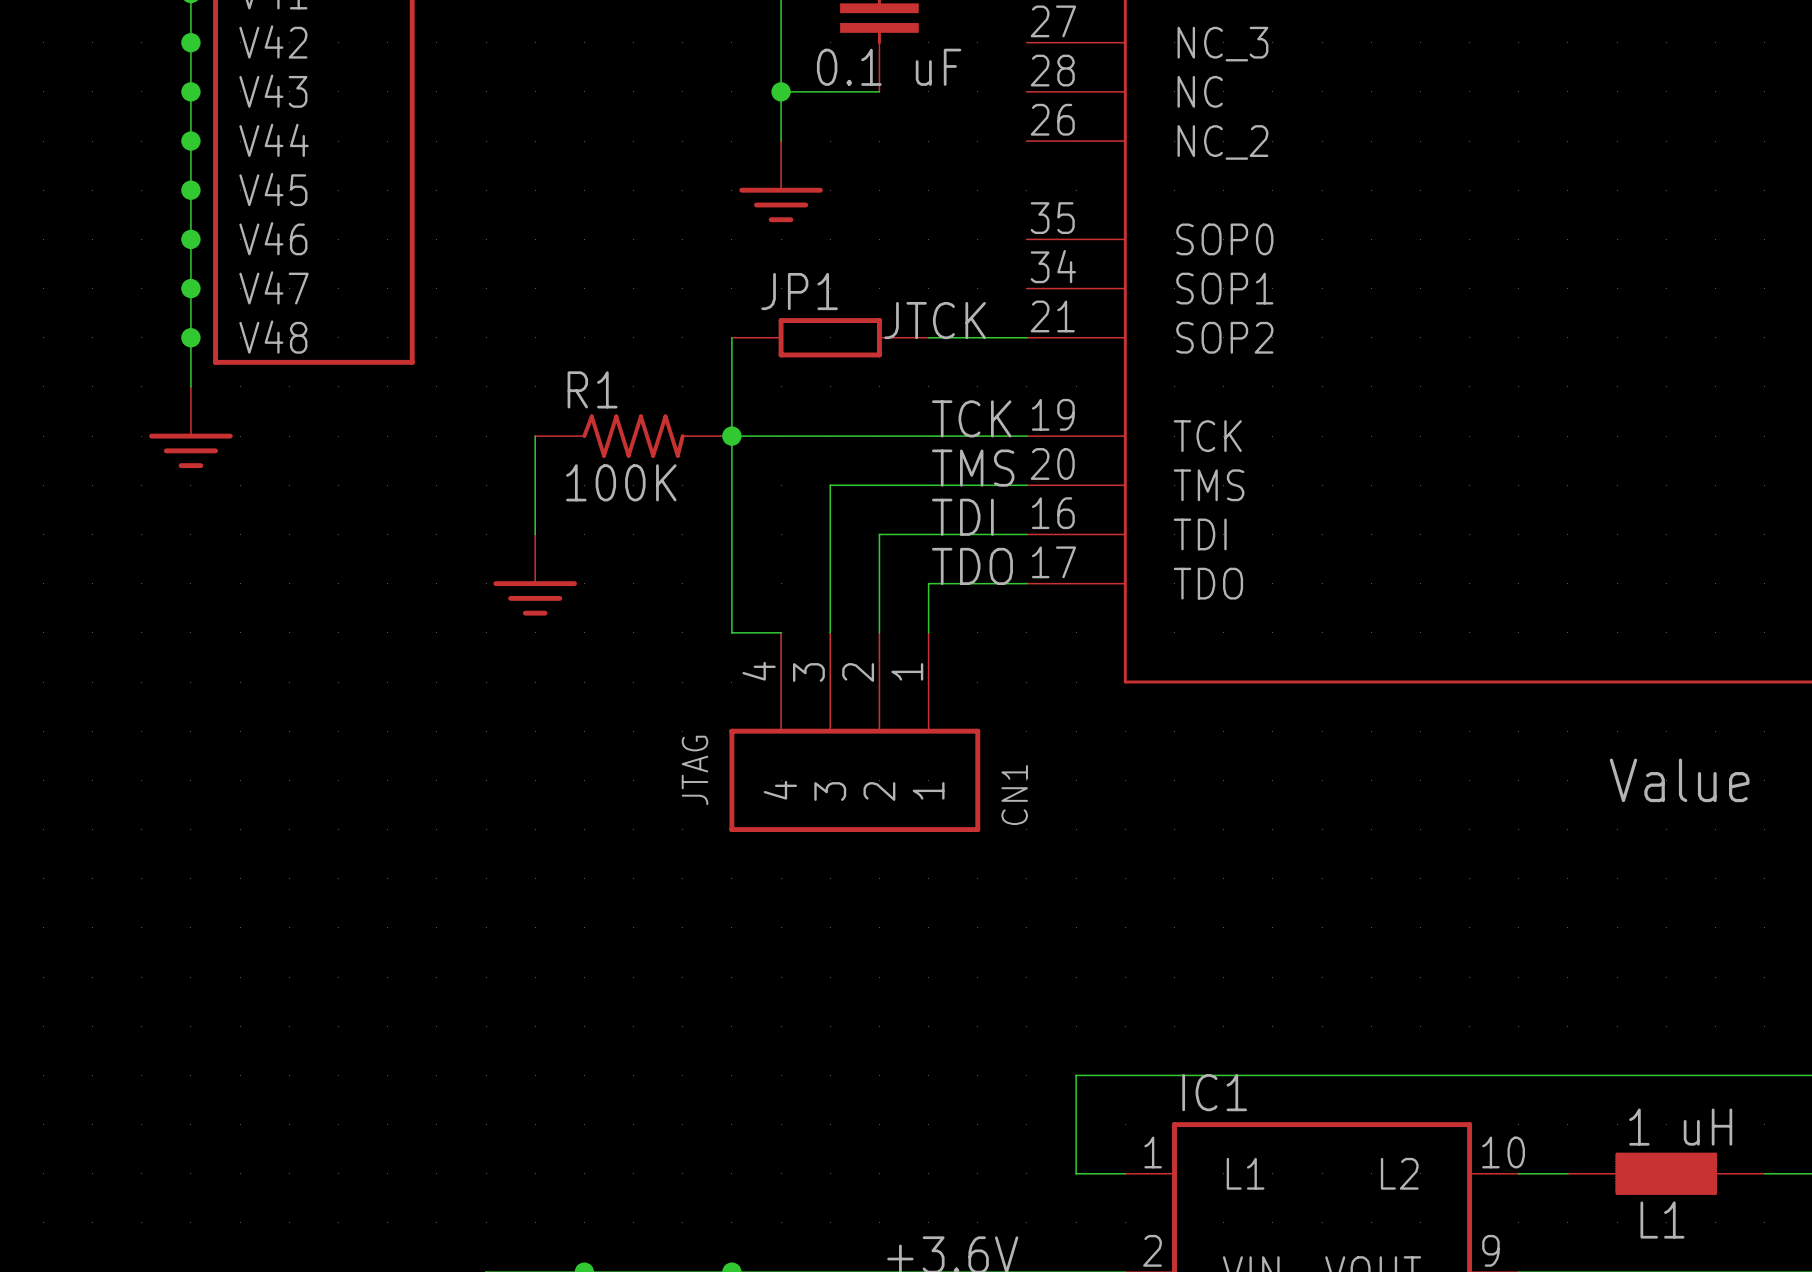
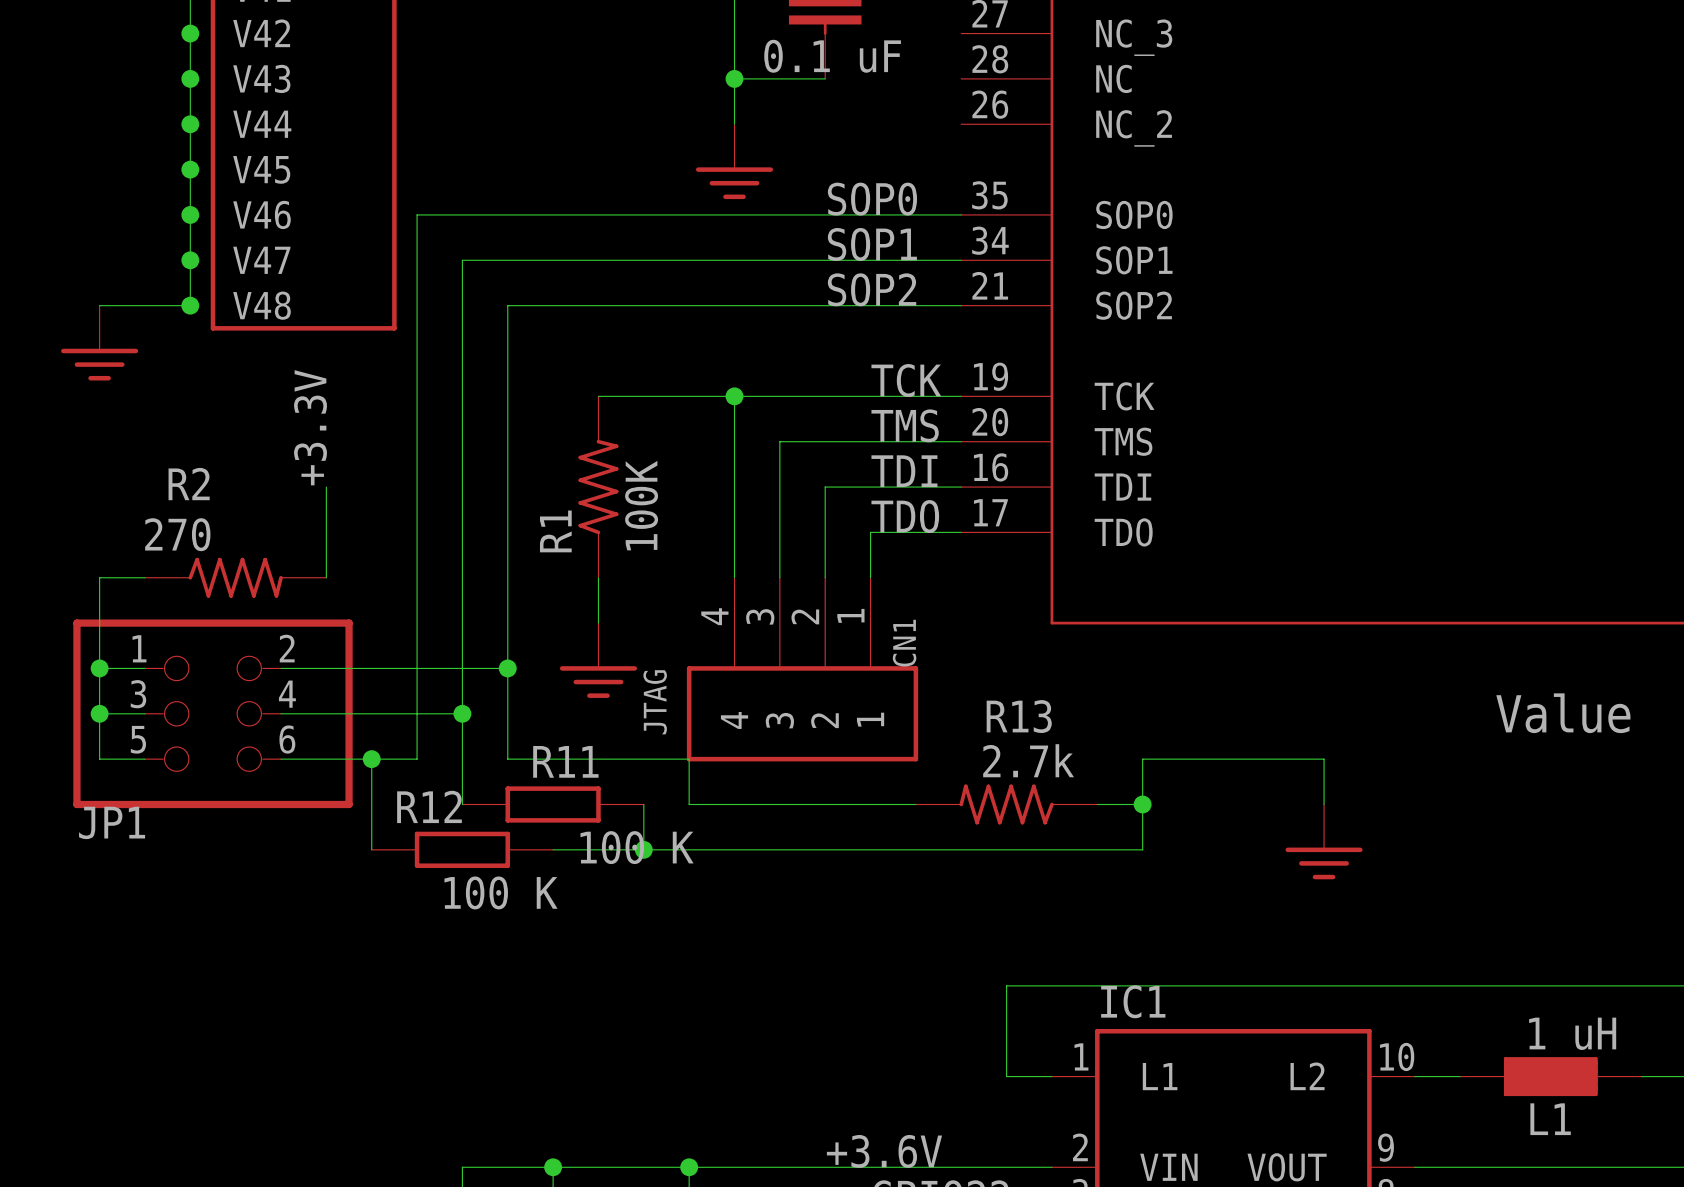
label: none -> SOP0 (872, 199)
wire: none -> (961, 214) (417, 214) (417, 759) (281, 759)
label: none -> SOP1 (872, 244)
wire: none -> (961, 260) (462, 260) (462, 804)
JP1 name position: JP1 (799, 291) -> JP1 (112, 822)
JP1 symbol: [731, 318, 929, 358] -> [73, 619, 353, 809]
label: JTCK (935, 320) -> SOP2 (872, 289)
wire: (190, 337) (190, 386) -> (190, 305) (99, 305)
wire: (731, 337) (731, 632) (781, 632) -> (734, 396) (734, 577)
wire: none -> (870, 305) (507, 305) (507, 396)
power symbol position: (190, 427) -> (99, 343)
R1 rotation: 0° (633, 436) -> 90° counterclockwise (598, 487)
junction position: (731, 436) -> (734, 396)
label: none -> +3.3V (310, 427)
wire: none -> (326, 487) (326, 577)
wire: none -> (507, 487) (507, 759) (689, 759) (689, 804) (915, 804)
power symbol position: (535, 575) -> (598, 660)
wire: none -> (144, 577) (99, 577) (99, 759) (144, 759)
R2: none -> 270 (235, 577)
wire: none -> (598, 577) (598, 623)
wire: none -> (99, 668) (144, 668)
junction: none -> (99, 668)
wire: none -> (281, 668) (507, 668)
junction: none -> (507, 668)
wire: none -> (99, 713) (144, 713)
junction: none -> (99, 713)
wire: none -> (281, 713) (462, 713)
junction: none -> (462, 713)
CN1 name position: CN1 (1014, 795) -> CN1 (904, 643)
wire: none -> (371, 759) (371, 849)
junction: none -> (371, 759)
R11: none -> 100 K (553, 804)
wire: none -> (643, 804) (643, 849)
R13: none -> 2.7k (1006, 804)
wire: none -> (1097, 804) (1142, 804)
junction: none -> (1142, 804)
wire: none -> (1324, 804) (1324, 759) (1142, 759) (1142, 849) (553, 849)
power symbol: none -> (1324, 841)
R12: none -> 100 K (462, 849)
junction: none -> (643, 849)

